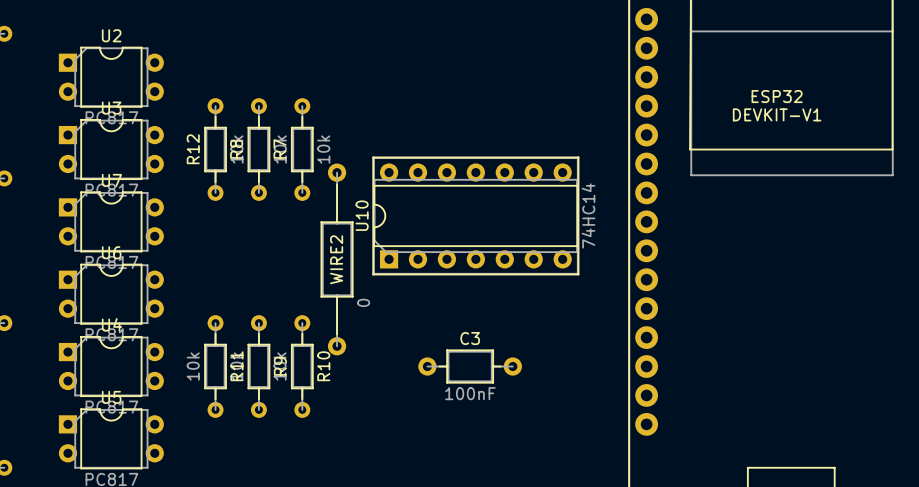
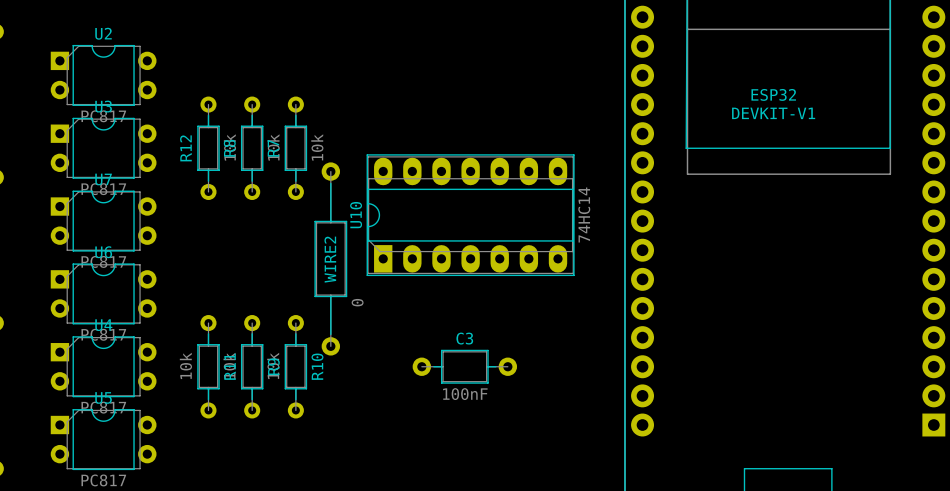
U10 footprint: [372, 156, 580, 276] -> [366, 154, 575, 277]

